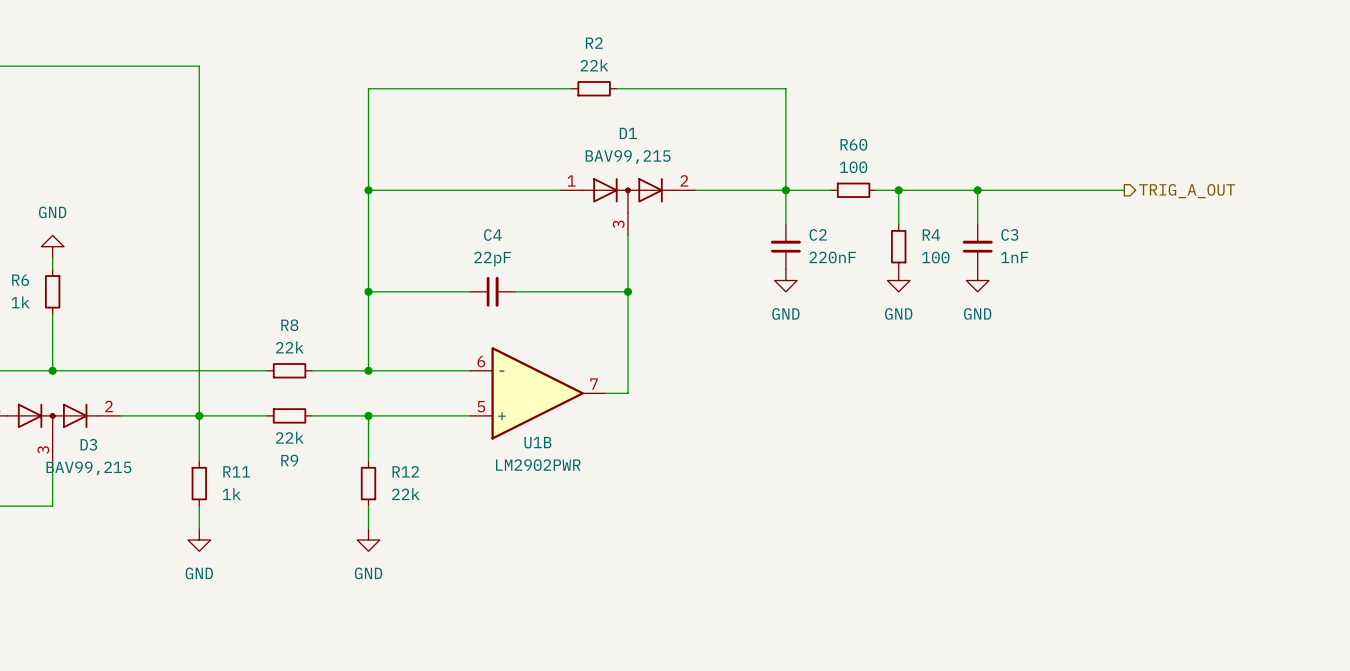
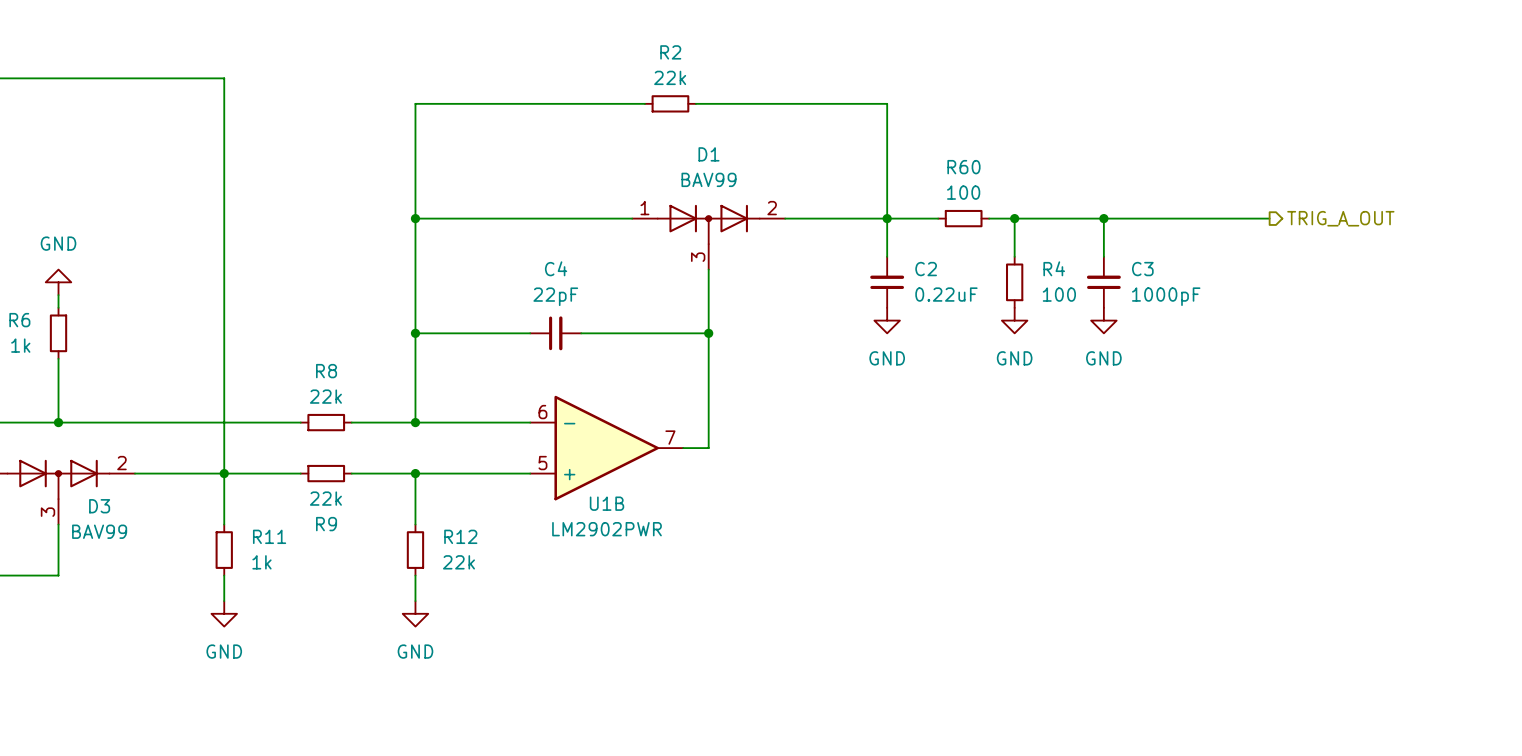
D1 value: BAV99,215 (628, 157) -> BAV99 (708, 179)
C2 value: 220nF (832, 257) -> 0.22uF (946, 294)
C3 value: 1nF (1014, 257) -> 1000pF (1166, 296)
D3 value: BAV99,215 (88, 468) -> BAV99 (99, 531)

